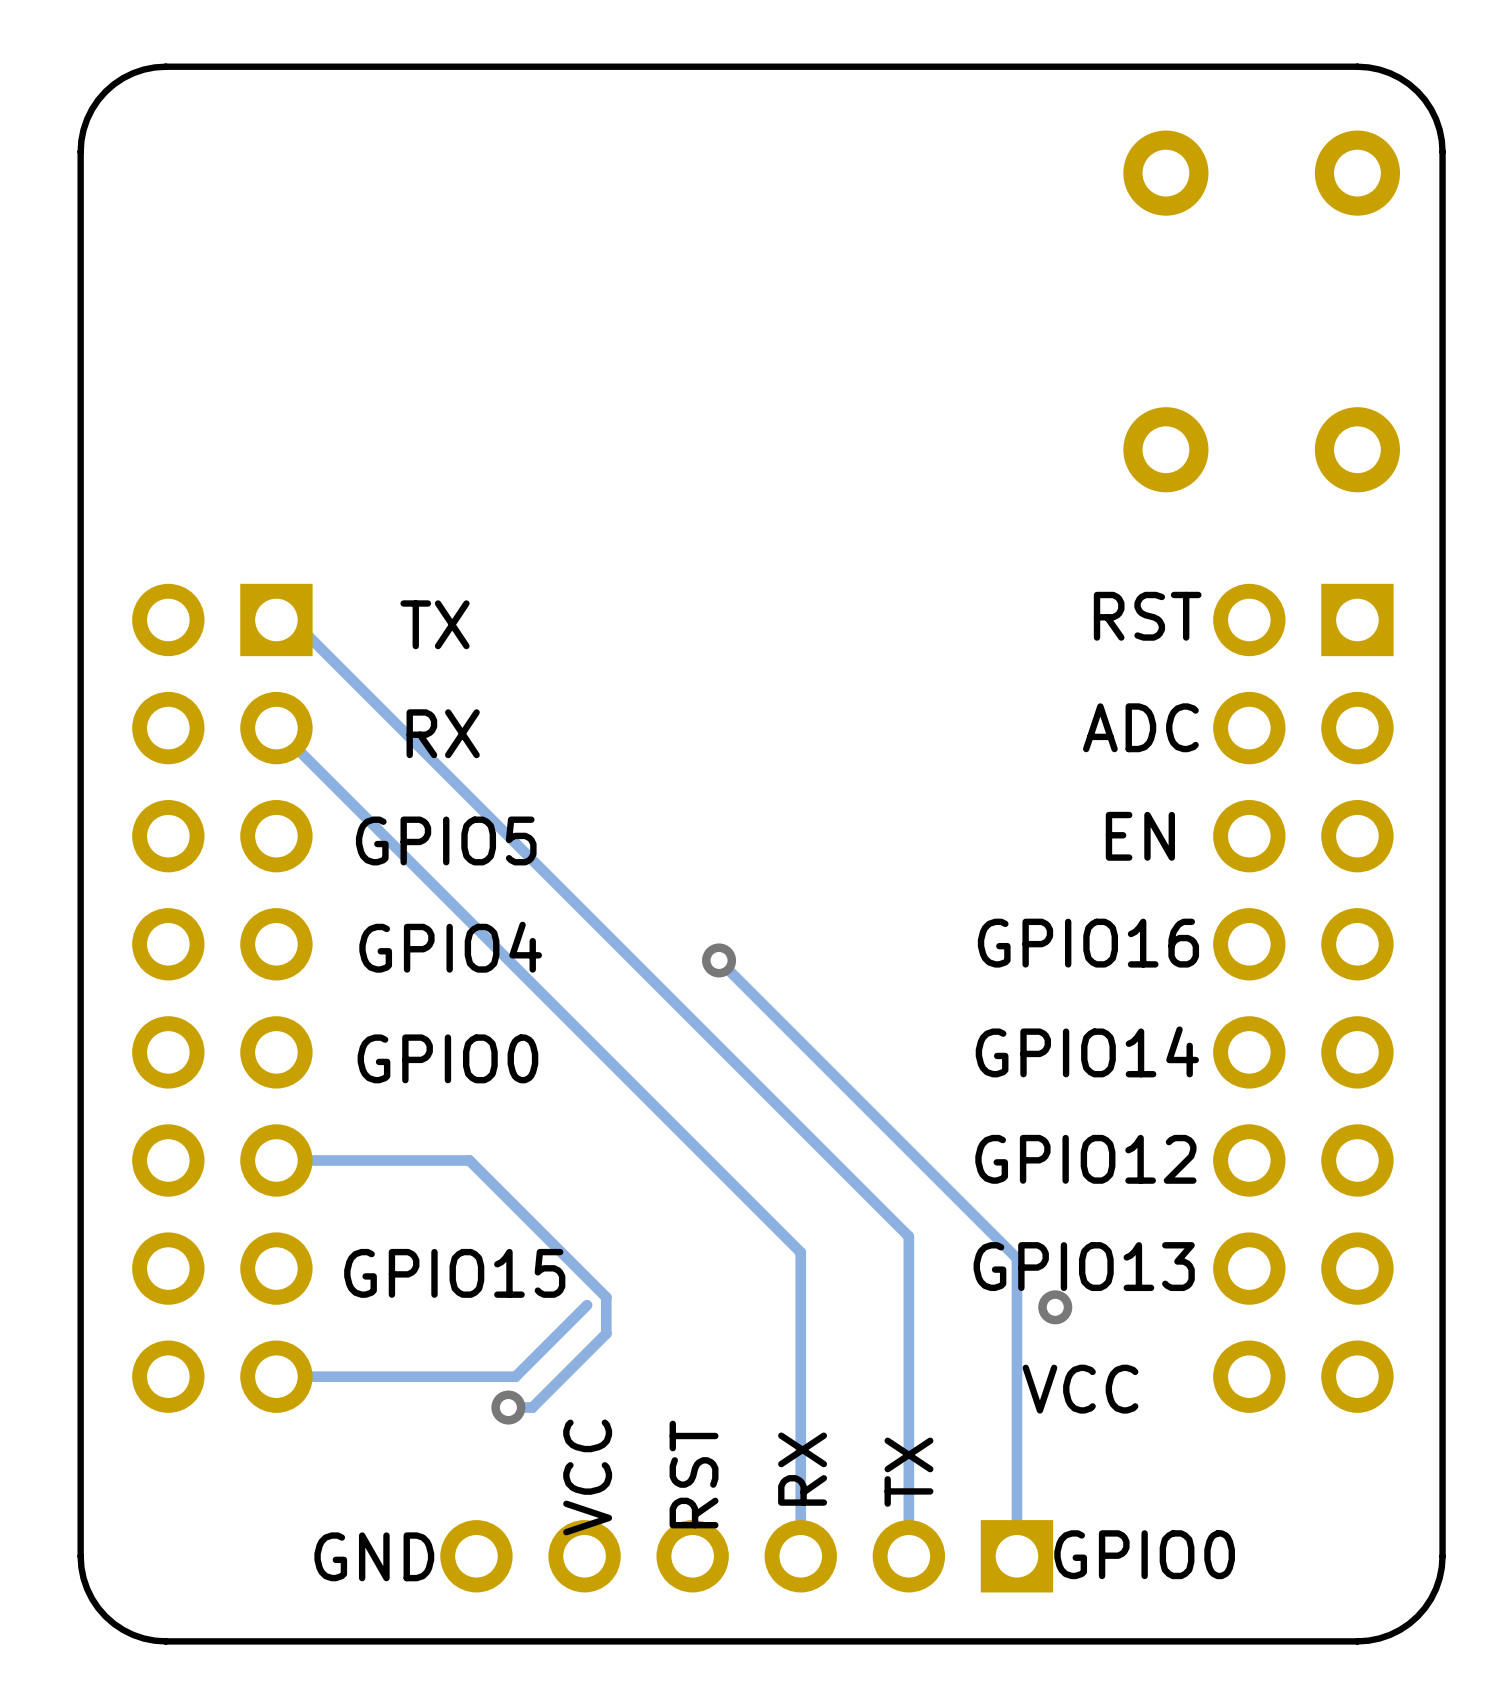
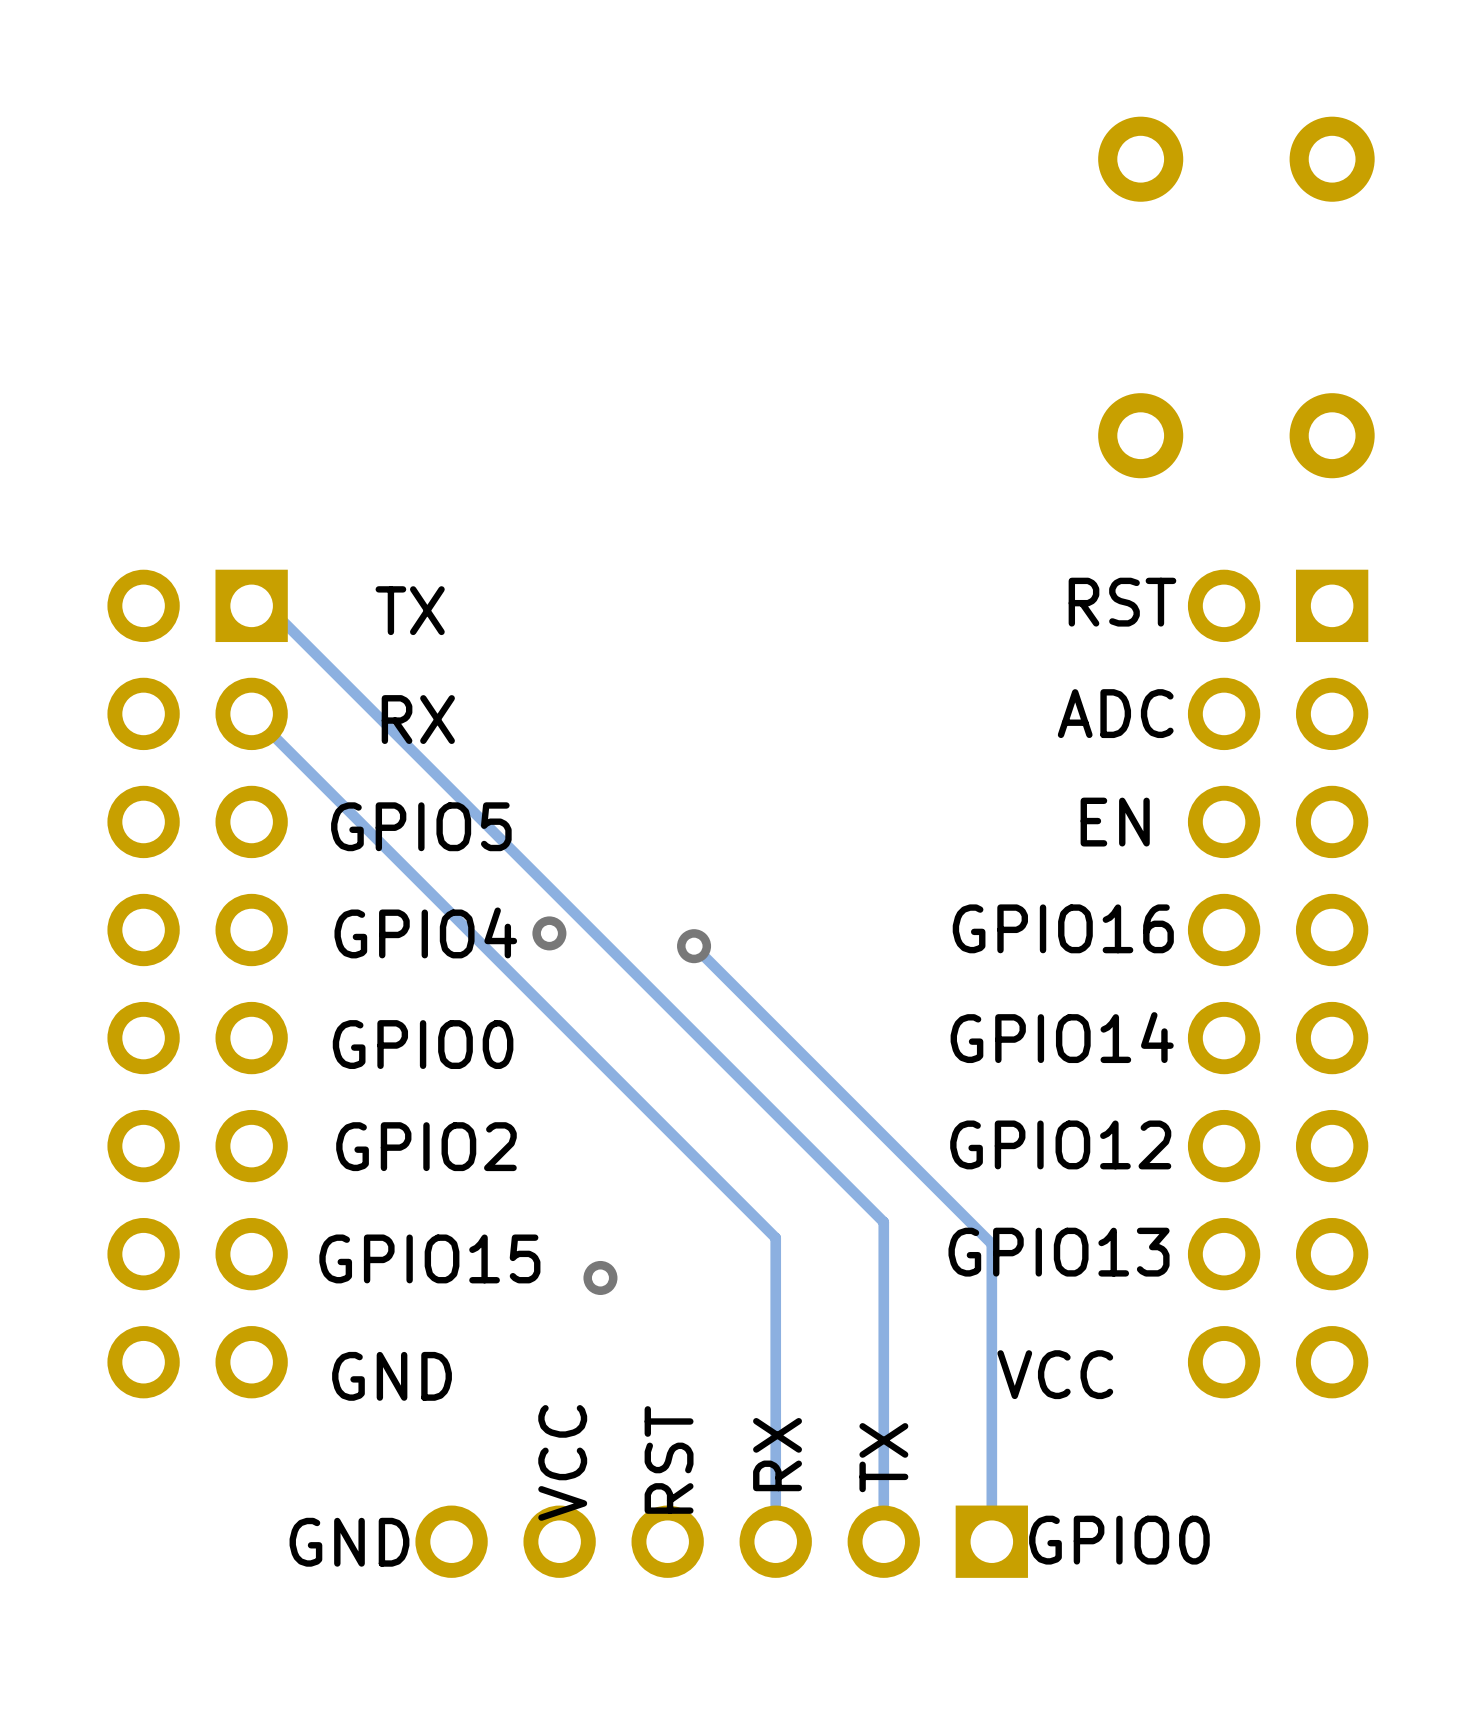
board edge: (1357, 66) (165, 66) (133, 73) (113, 84) (98, 100) (83, 129) (80, 151) (80, 1556) (83, 1578) (92, 1598) (113, 1623) (133, 1634) (165, 1641) (1357, 1641) (1379, 1638) (1399, 1630) (1424, 1608) (1436, 1588) (1442, 1556) (1442, 151) (1436, 119) (1417, 91) (1390, 73) (1357, 66) -> none
via: none -> (549, 933)
track: (276, 1160) (469, 1160) (606, 1297) (606, 1333) (532, 1407) (508, 1407) -> none
text: none -> GPIO2 (426, 1146)
track: (587, 1305) (515, 1376) (276, 1376) -> none
via: (1055, 1307) -> none
text: none -> GND (392, 1376)
via position: (508, 1407) -> (600, 1277)

